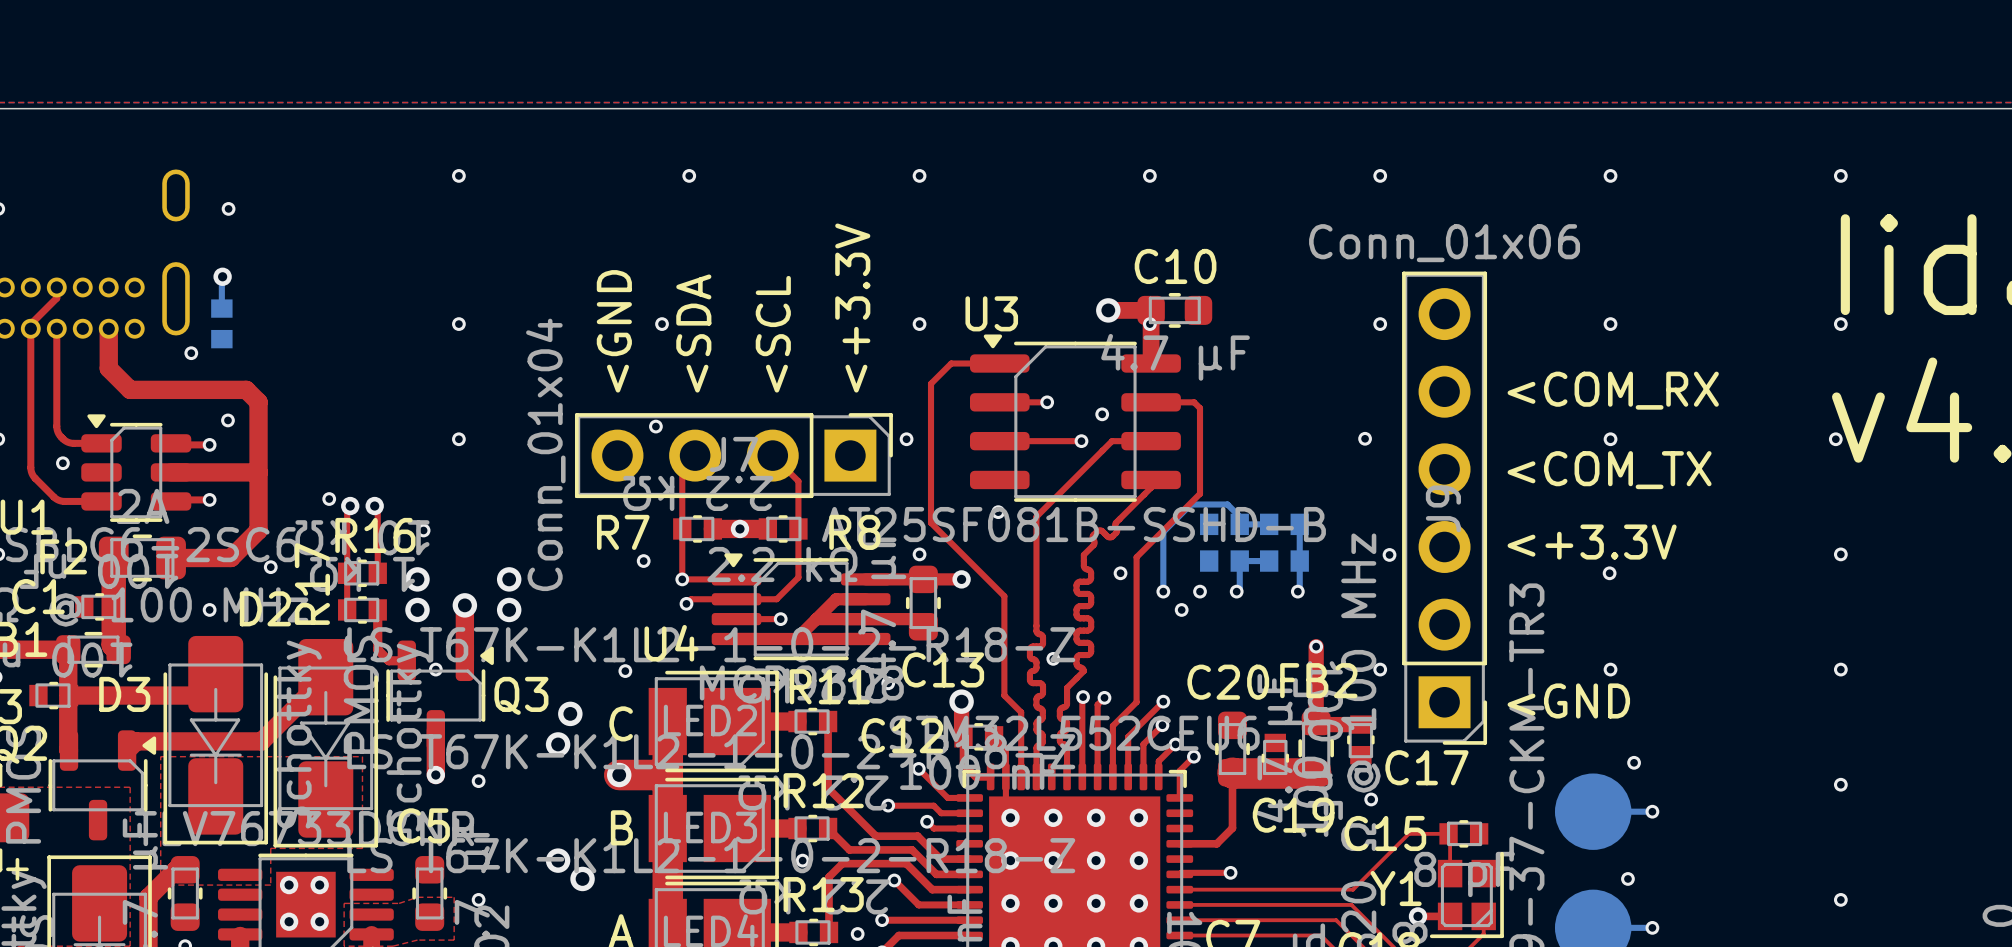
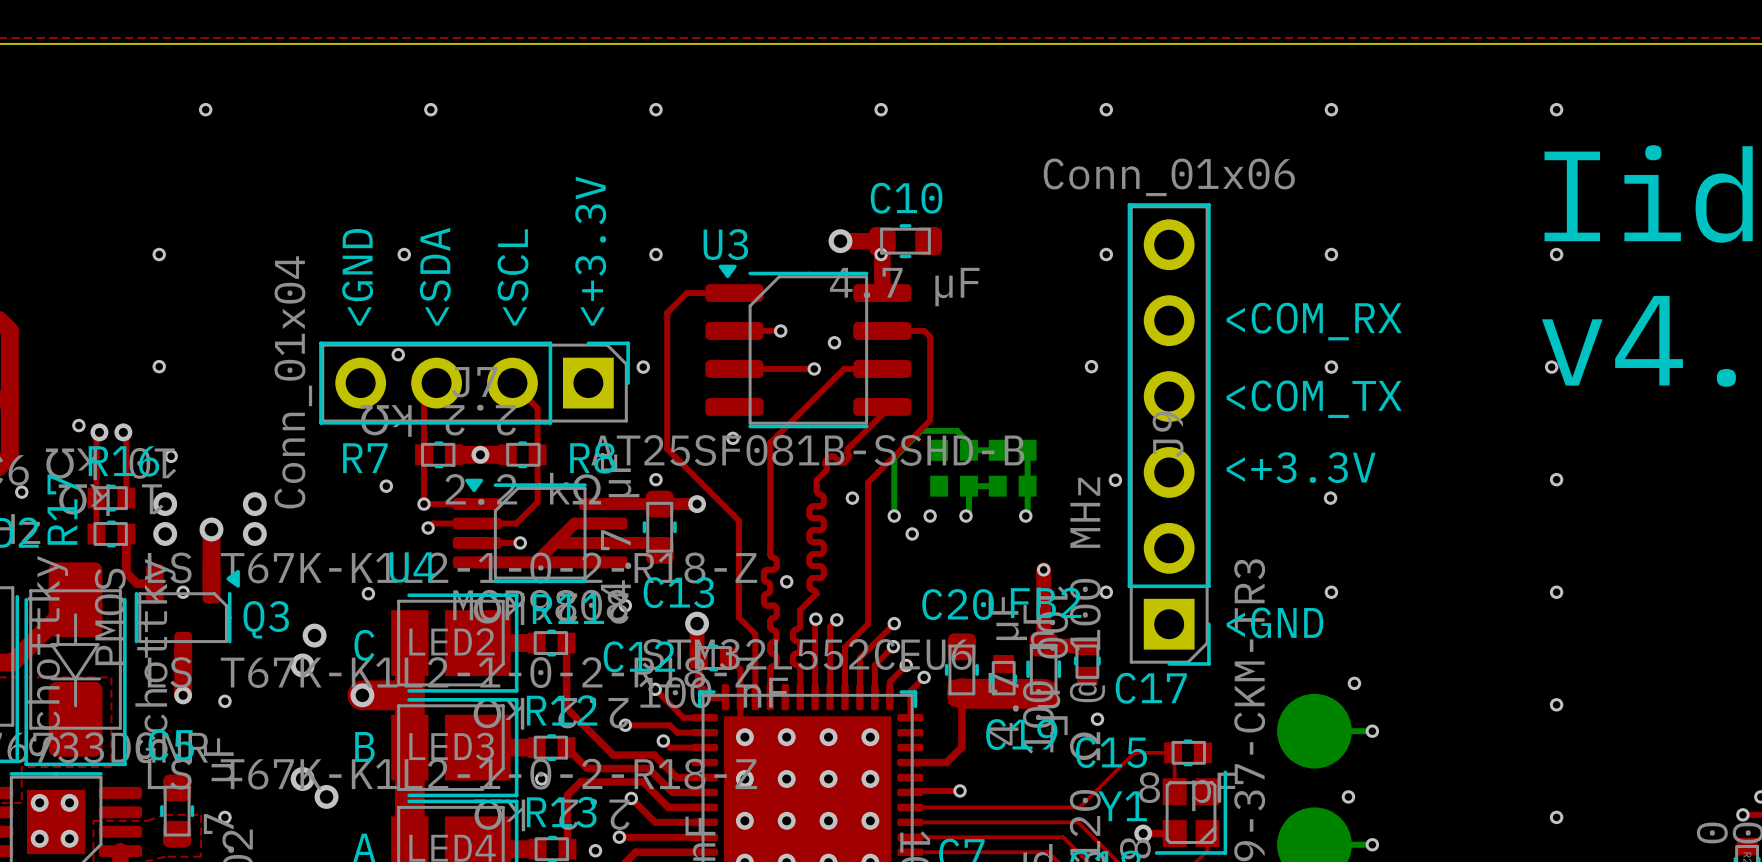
via position: (458, 324) -> (159, 254)
via position: (458, 439) -> (159, 366)

